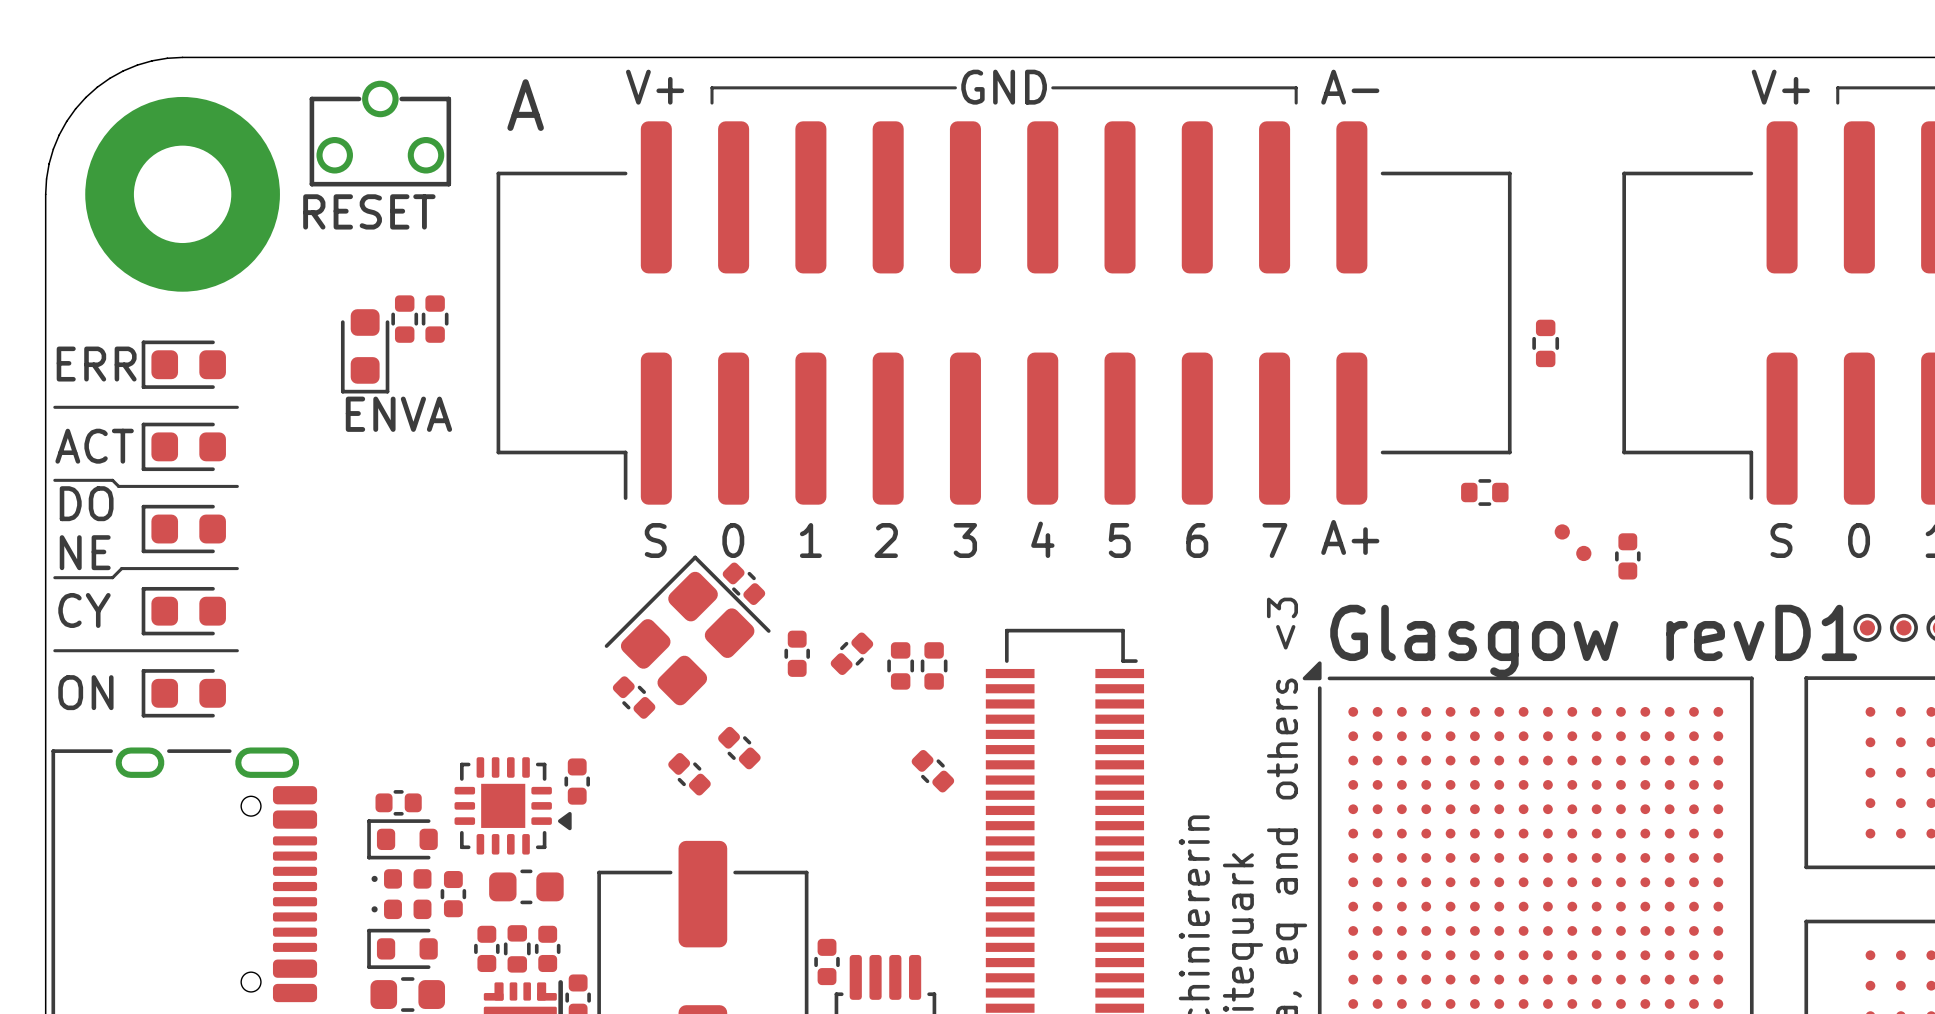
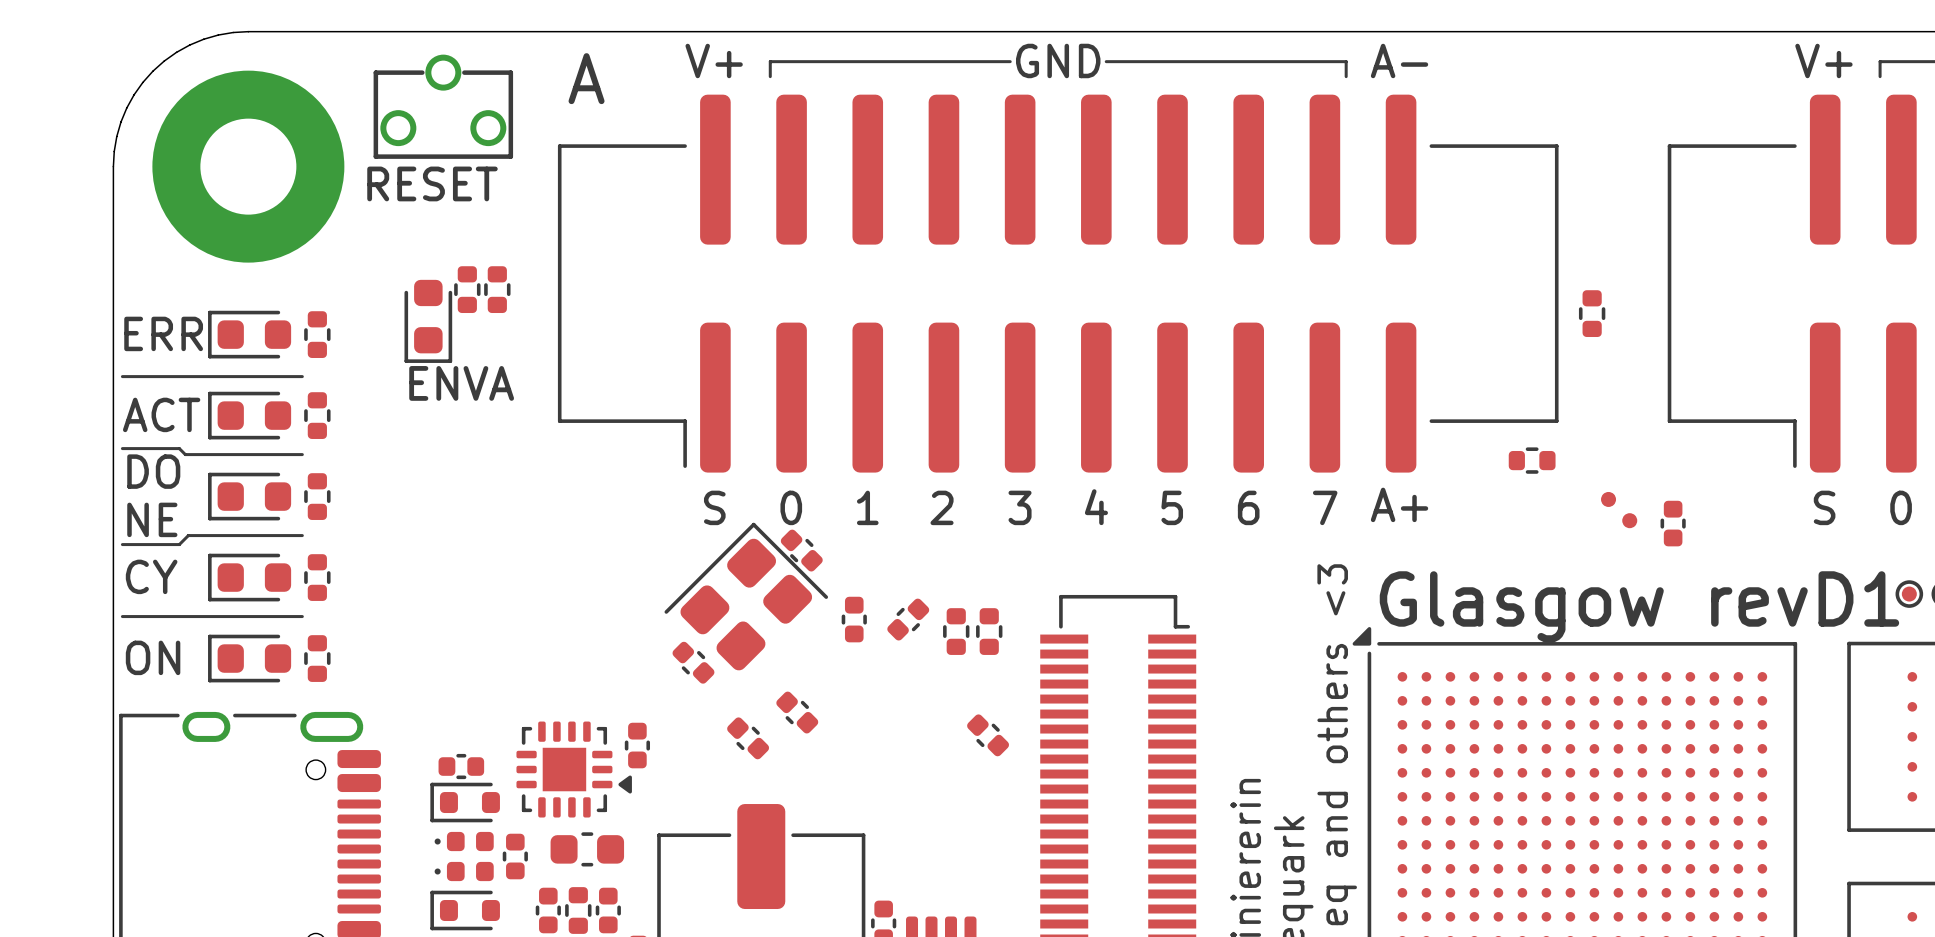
part: none -> (317, 334)
part: none -> (317, 415)
part: none -> (317, 496)
part: none -> (317, 577)
part: none -> (317, 658)

